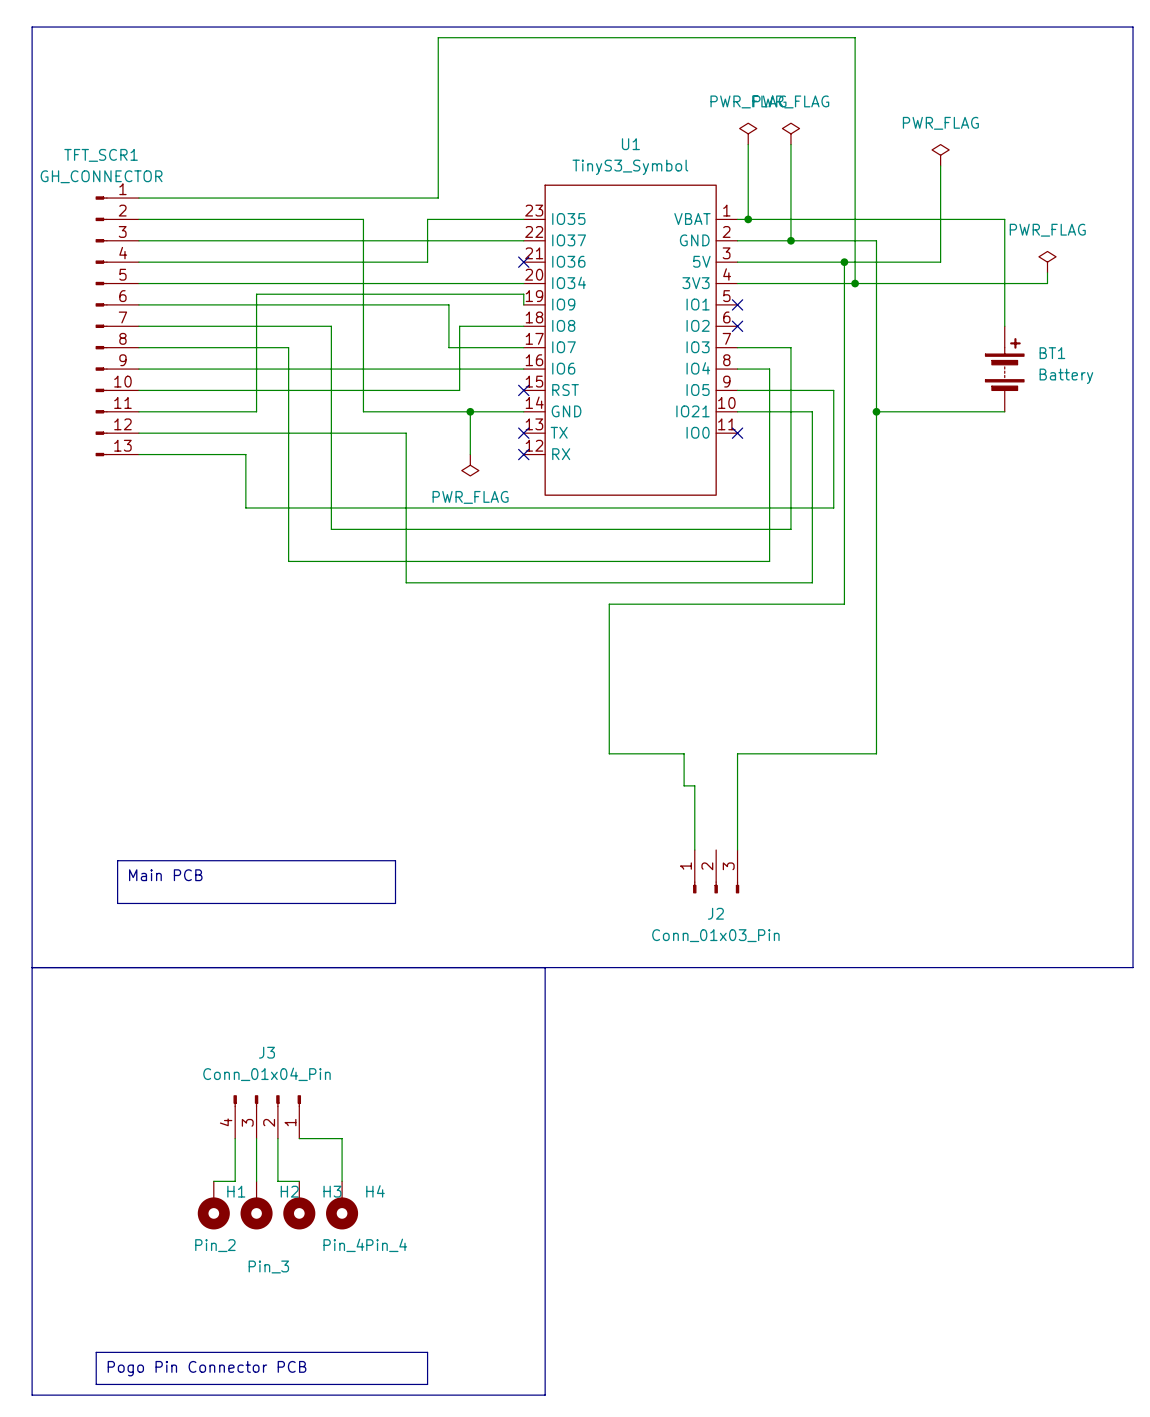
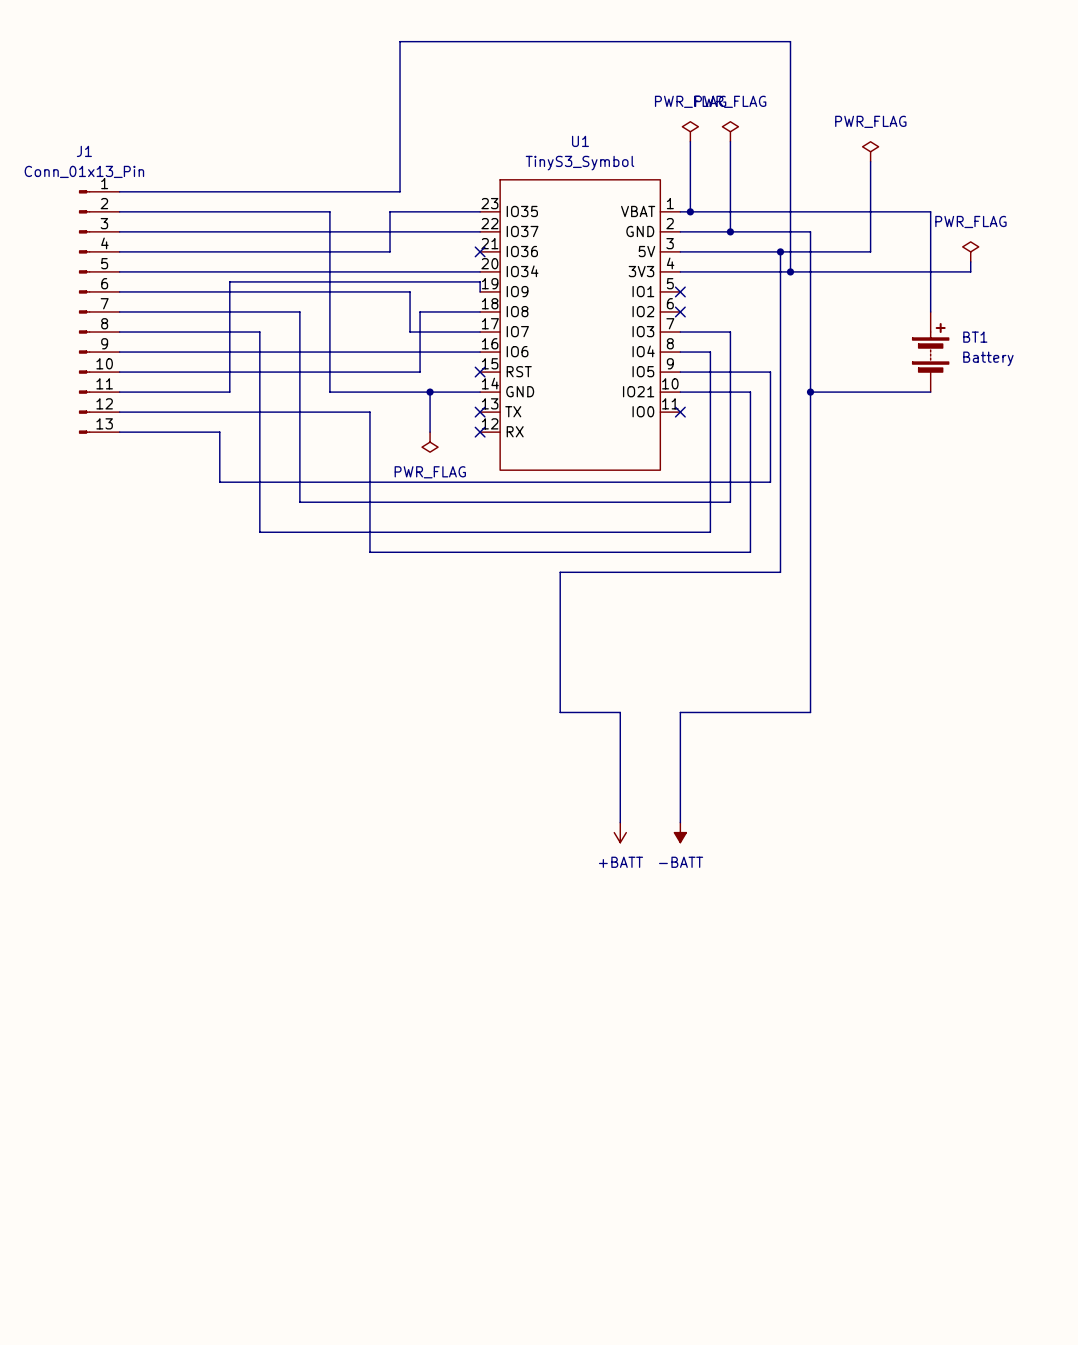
TFT_SCR1 name: TFT_SCR1 (101, 155) -> J1 (84, 151)
TFT_SCR1 value: GH_CONNECTOR (101, 176) -> Conn_01x13_Pin (84, 171)
wire: (673, 753) (684, 753) (684, 785) (694, 785) (694, 850) -> (620, 712) (620, 822)
line: (117, 860) (395, 860) (395, 903) (117, 903) (117, 860) -> none
J2: Conn_01x03_Pin (716, 871) -> none
text: Main PCB (165, 875) -> none
power symbol: none -> +BATT (620, 832)
power symbol: none -> -BATT (680, 832)
line: (32, 967) (1133, 967) (1133, 27) (32, 27) (32, 1395) (545, 1395) (545, 967) -> none
J3: Conn_01x04_Pin (267, 1116) -> none
wire: (235, 1138) (235, 1181) (213, 1181) -> none
wire: (256, 1138) (256, 1181) -> none
wire: (277, 1138) (277, 1181) (299, 1181) -> none
wire: (299, 1138) (342, 1138) (342, 1181) -> none
H1: Pin_2 (213, 1205) -> none
H2: Pin_3 (256, 1205) -> none
H3: Pin_4 (299, 1205) -> none
H4: Pin_4 (342, 1205) -> none
line: (96, 1352) (427, 1352) (427, 1384) (96, 1384) (96, 1352) -> none
text: Pogo Pin Connector PCB (207, 1368) -> none

